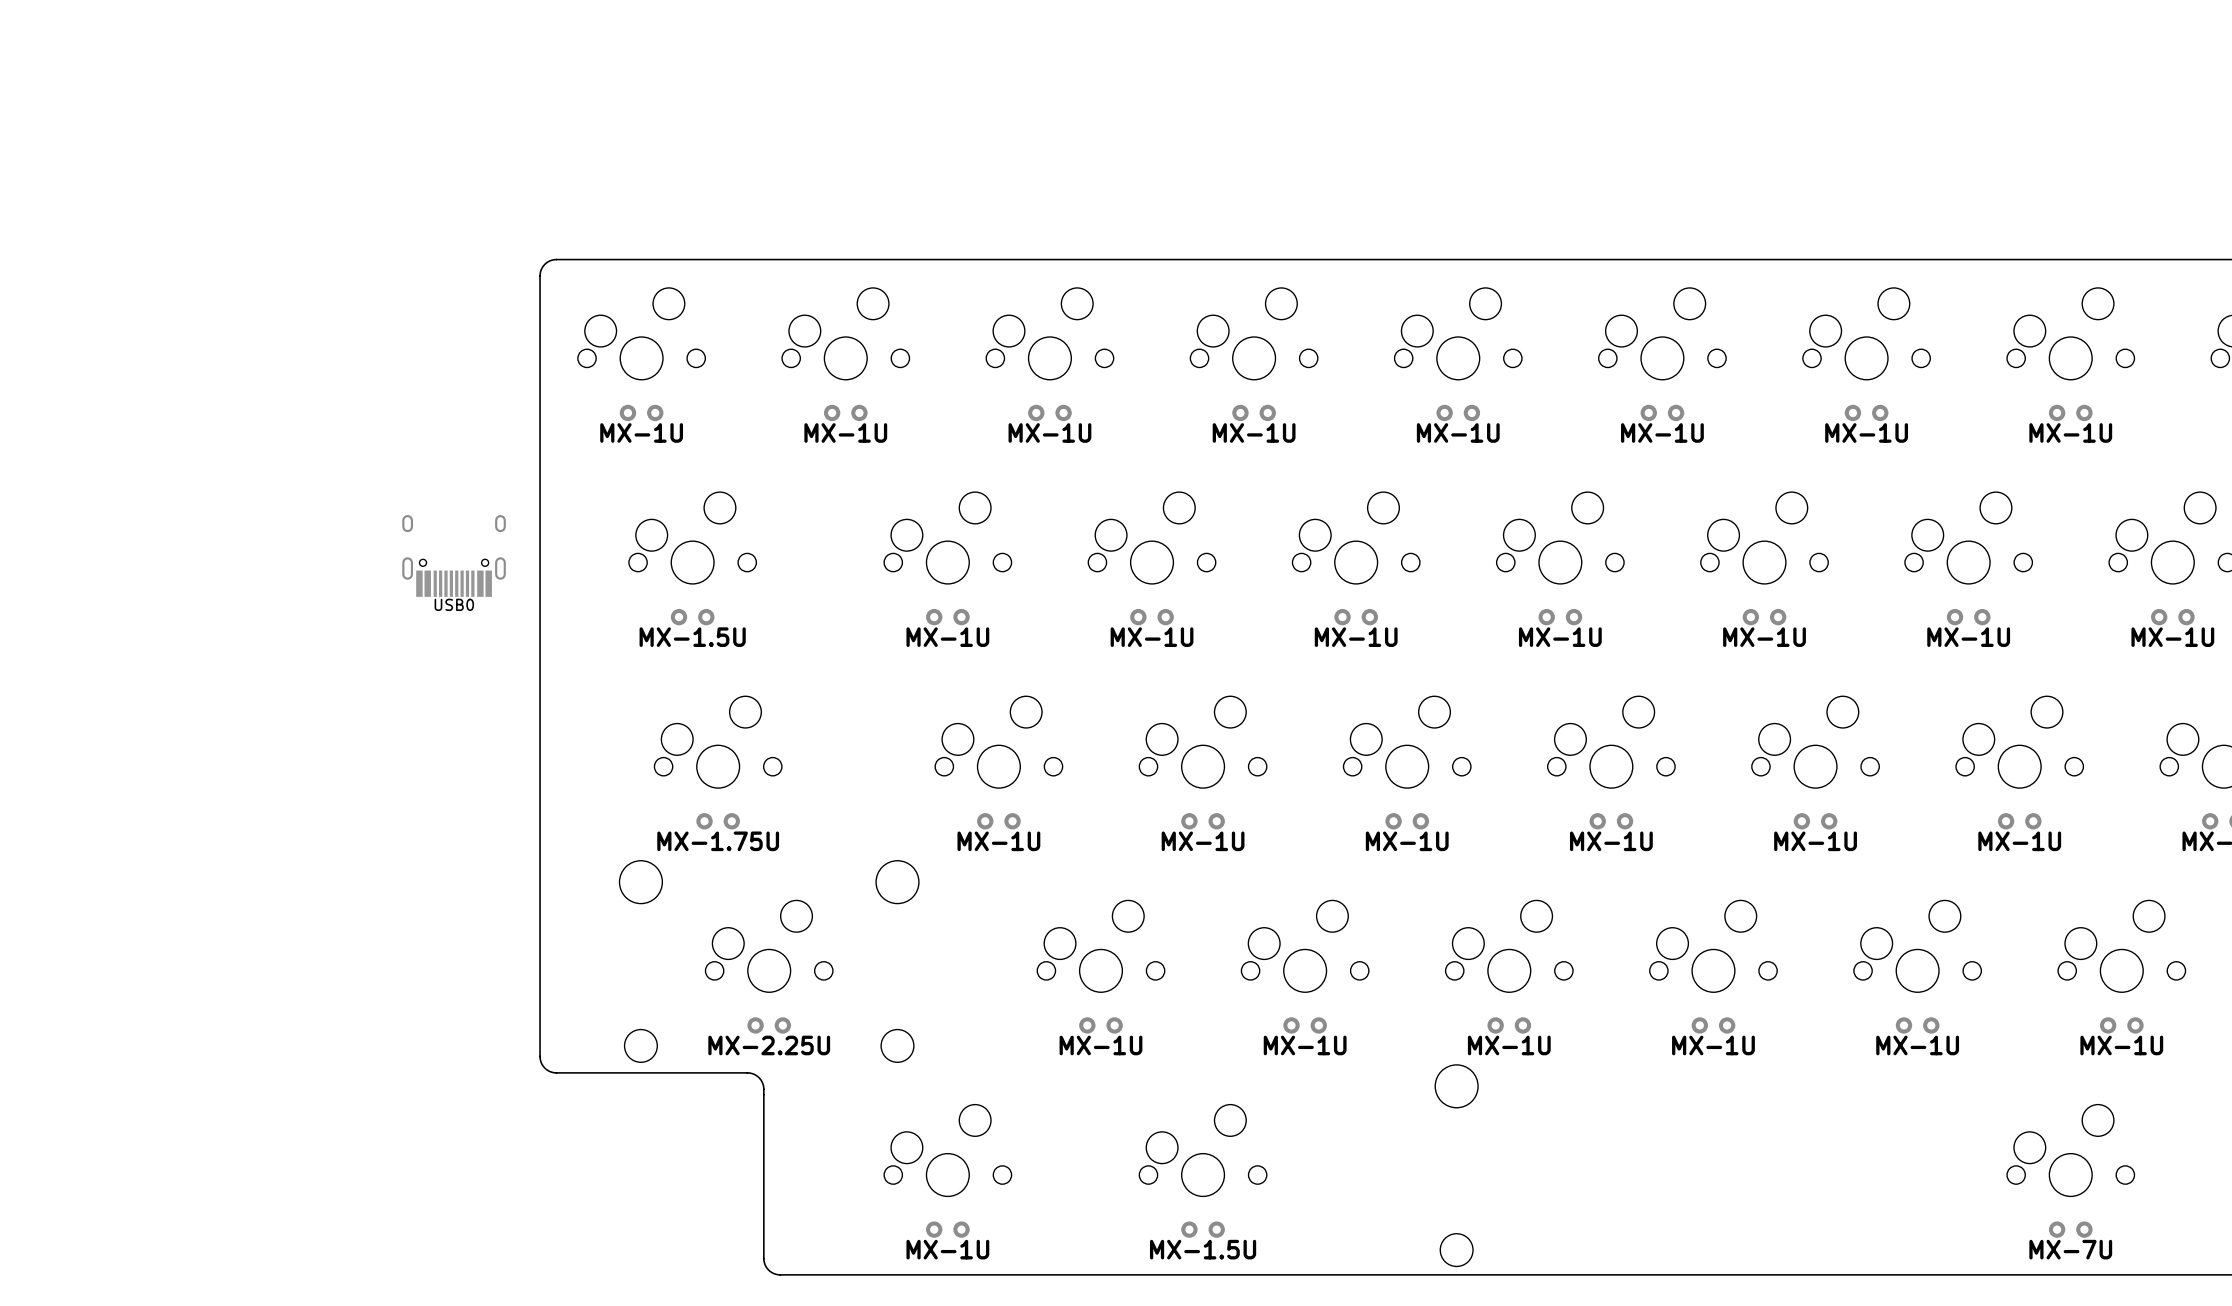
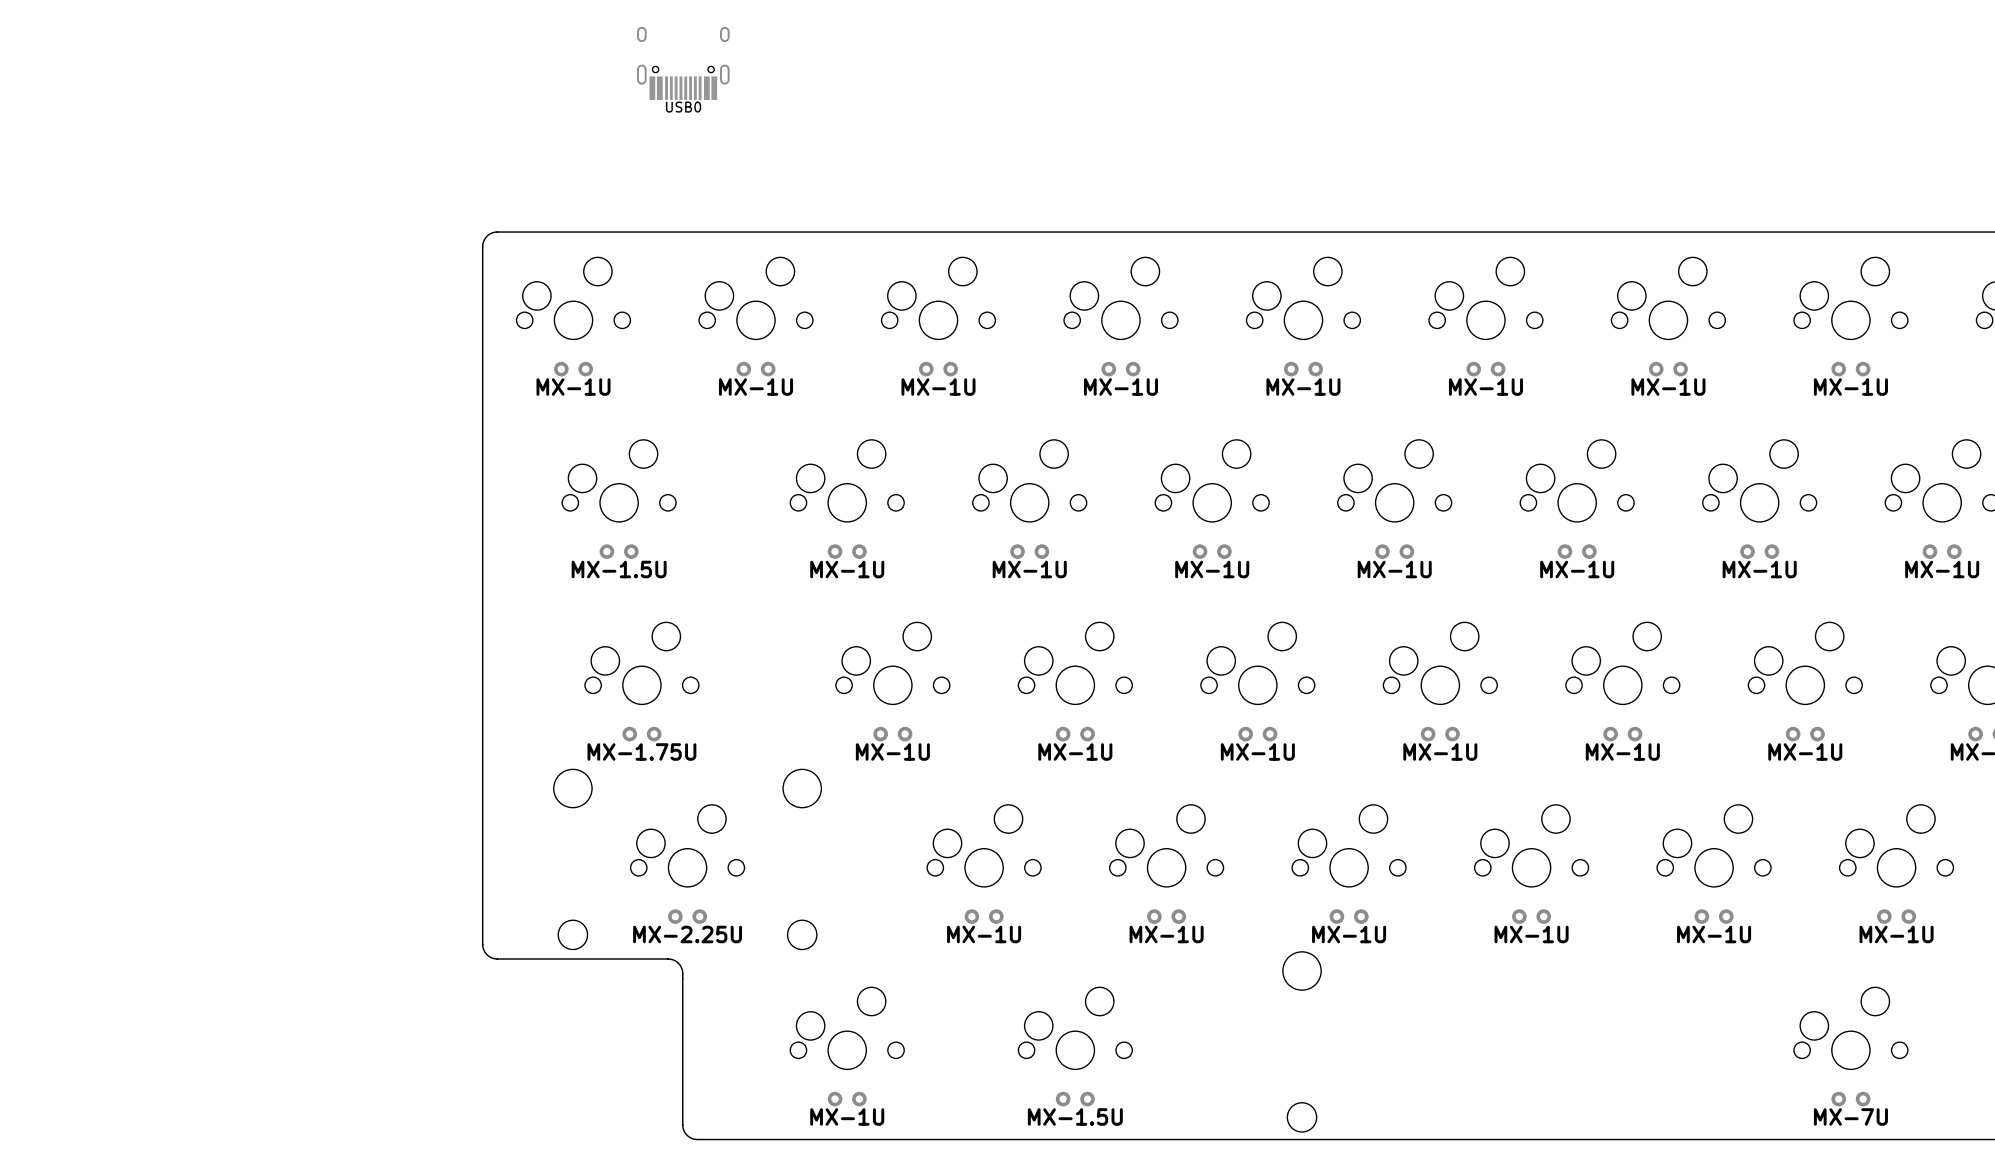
USB0 position: (454, 555) -> (683, 63)

